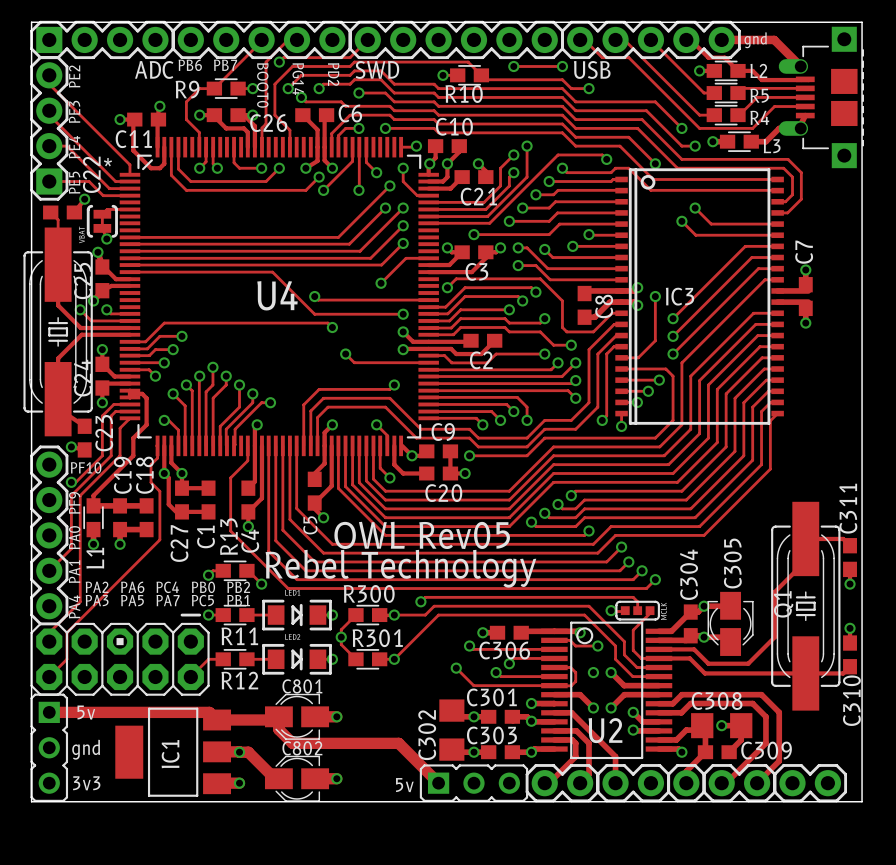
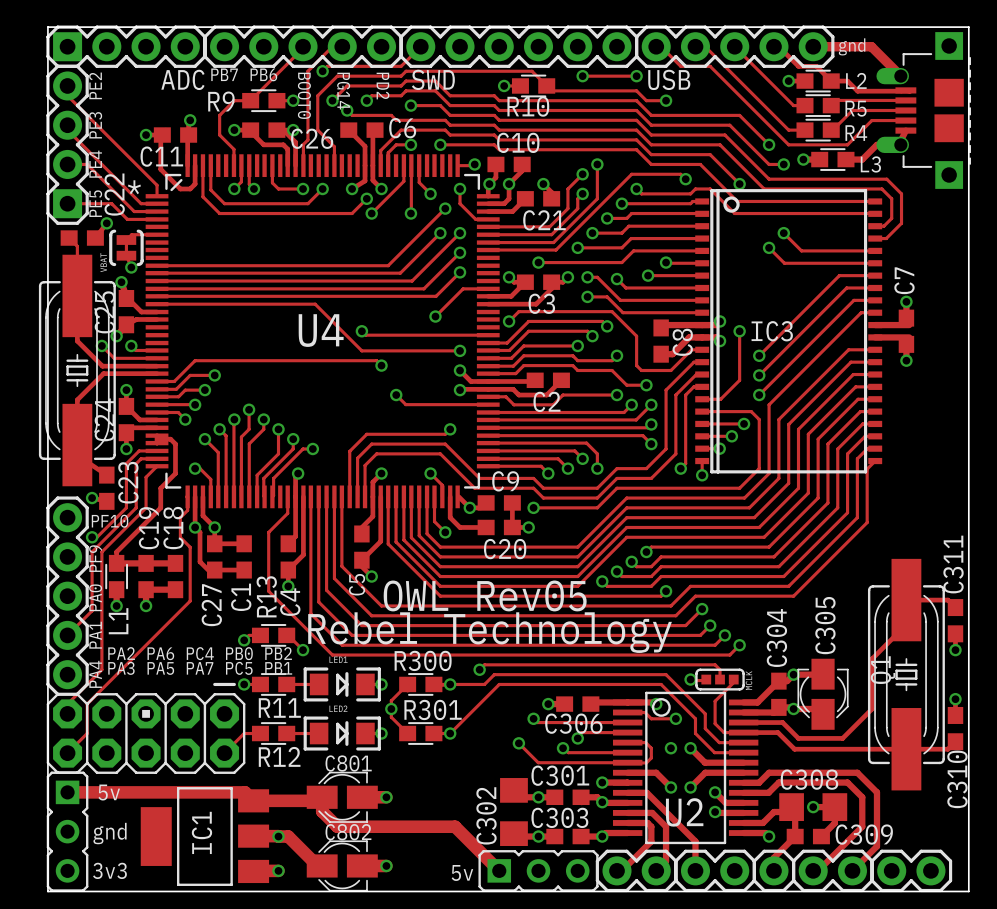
text: PB6 (190, 65) -> PB7 (224, 74)
text: PB7 (225, 65) -> PB6 (263, 74)

